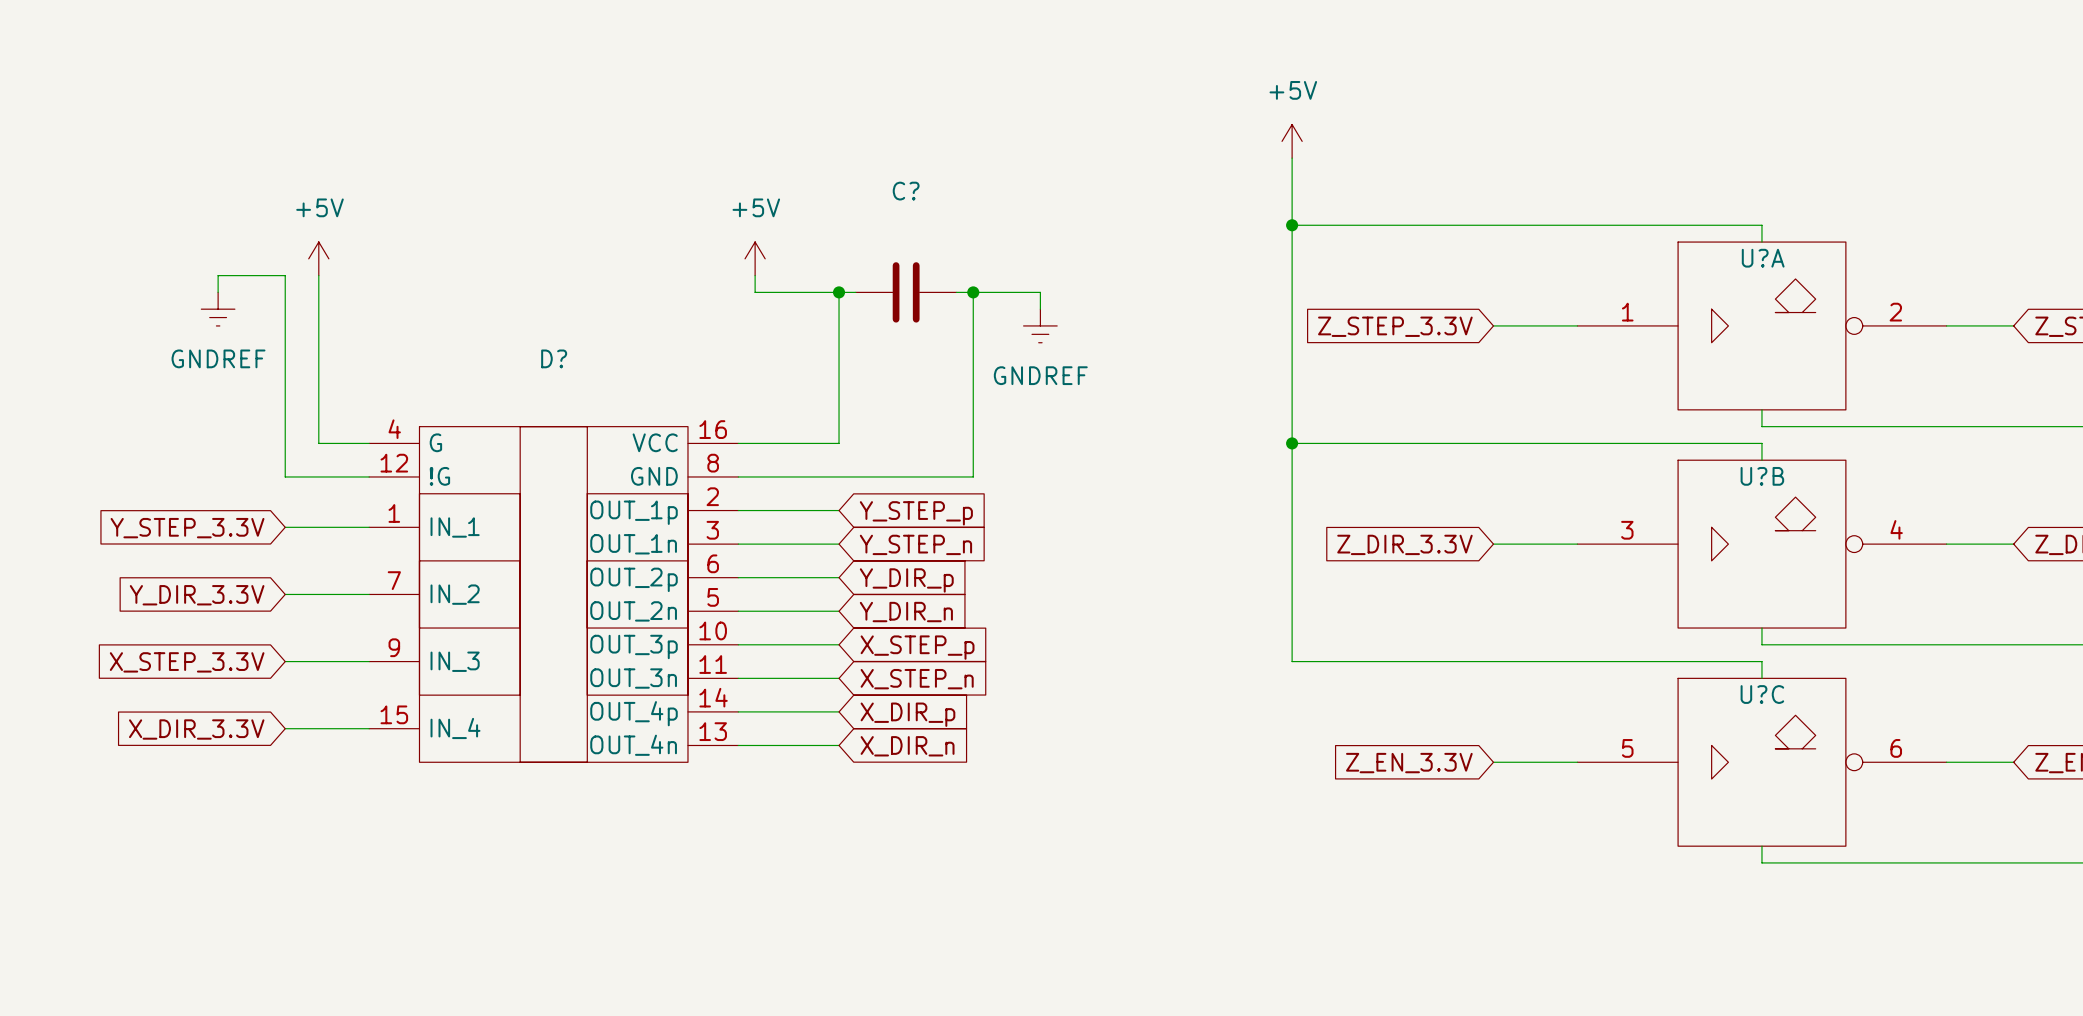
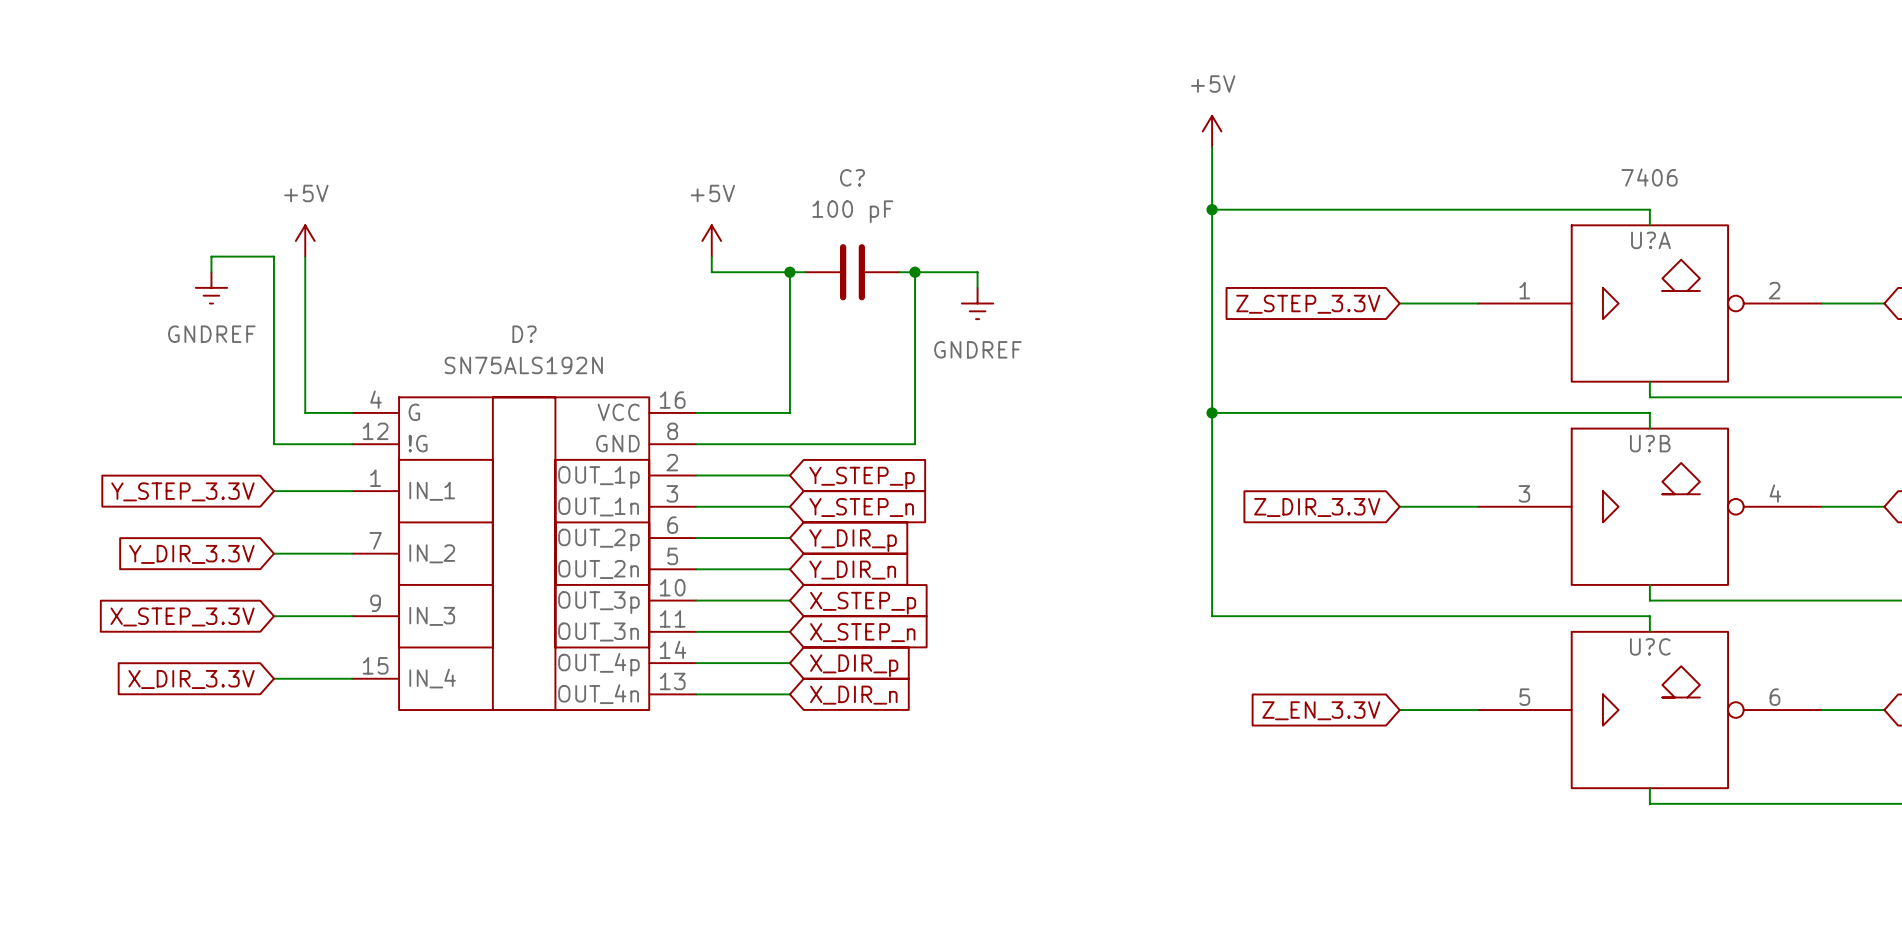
U?A value: none -> 7406 (1649, 177)
C? value: none -> 100 pF (852, 211)
D? value: none -> SN75ALS192N (523, 365)

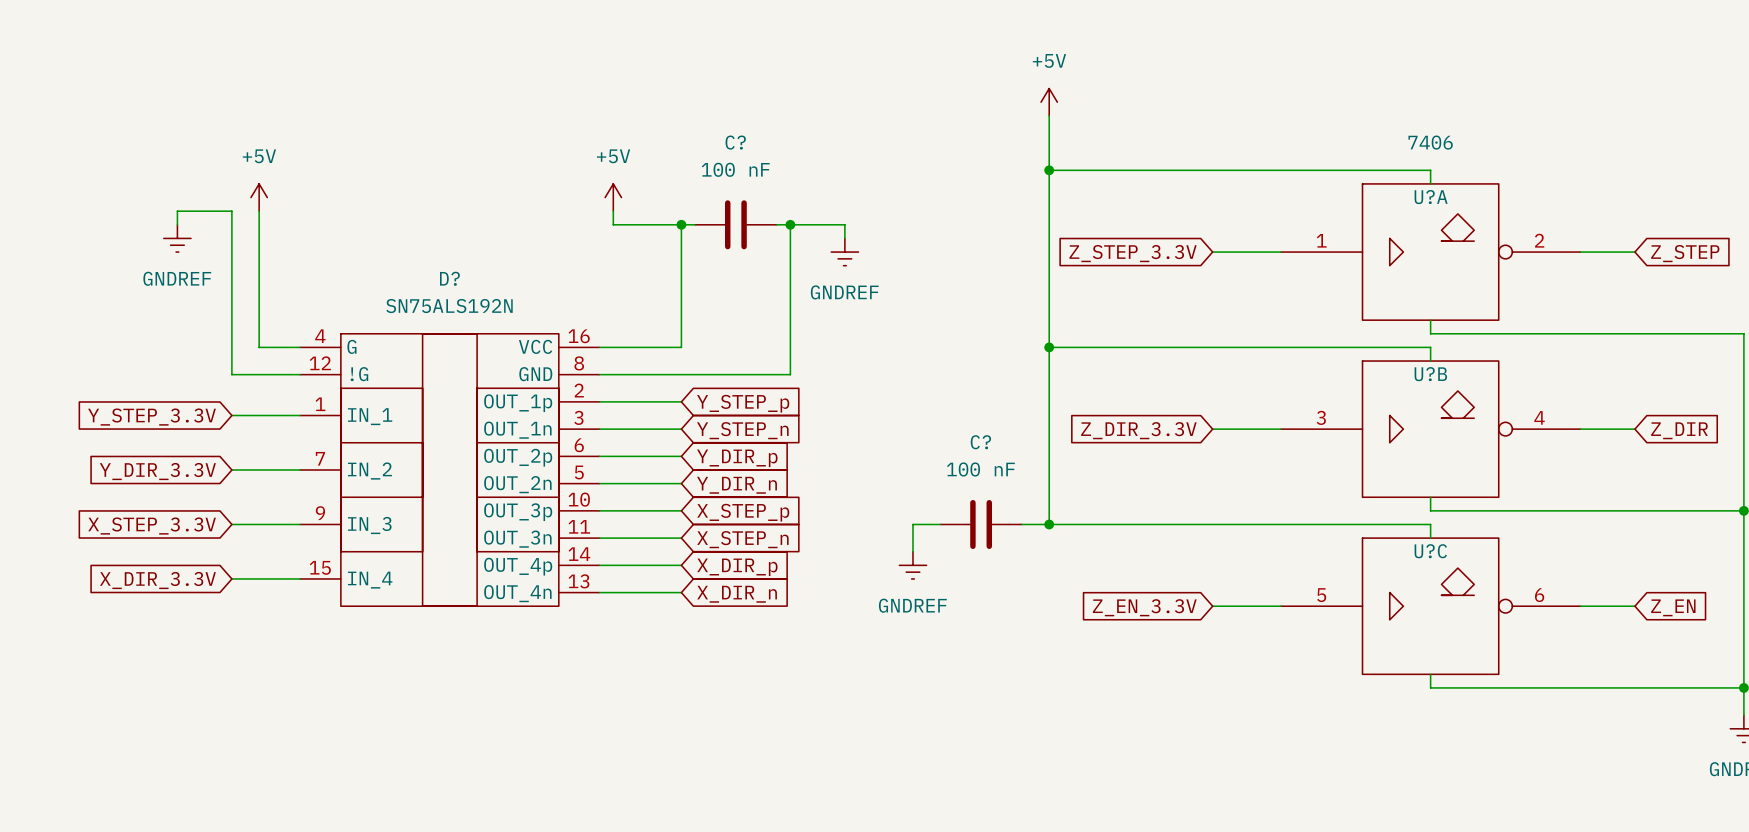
C? value: 100 pF (852, 211) -> 100 nF (735, 169)
wire: none -> (940, 524) (912, 524) (912, 551)
C?: none -> 100 nF (981, 524)
wire: none -> (1021, 524) (1049, 524)
junction: none -> (1049, 524)
power symbol: none -> GNDREF (912, 565)

